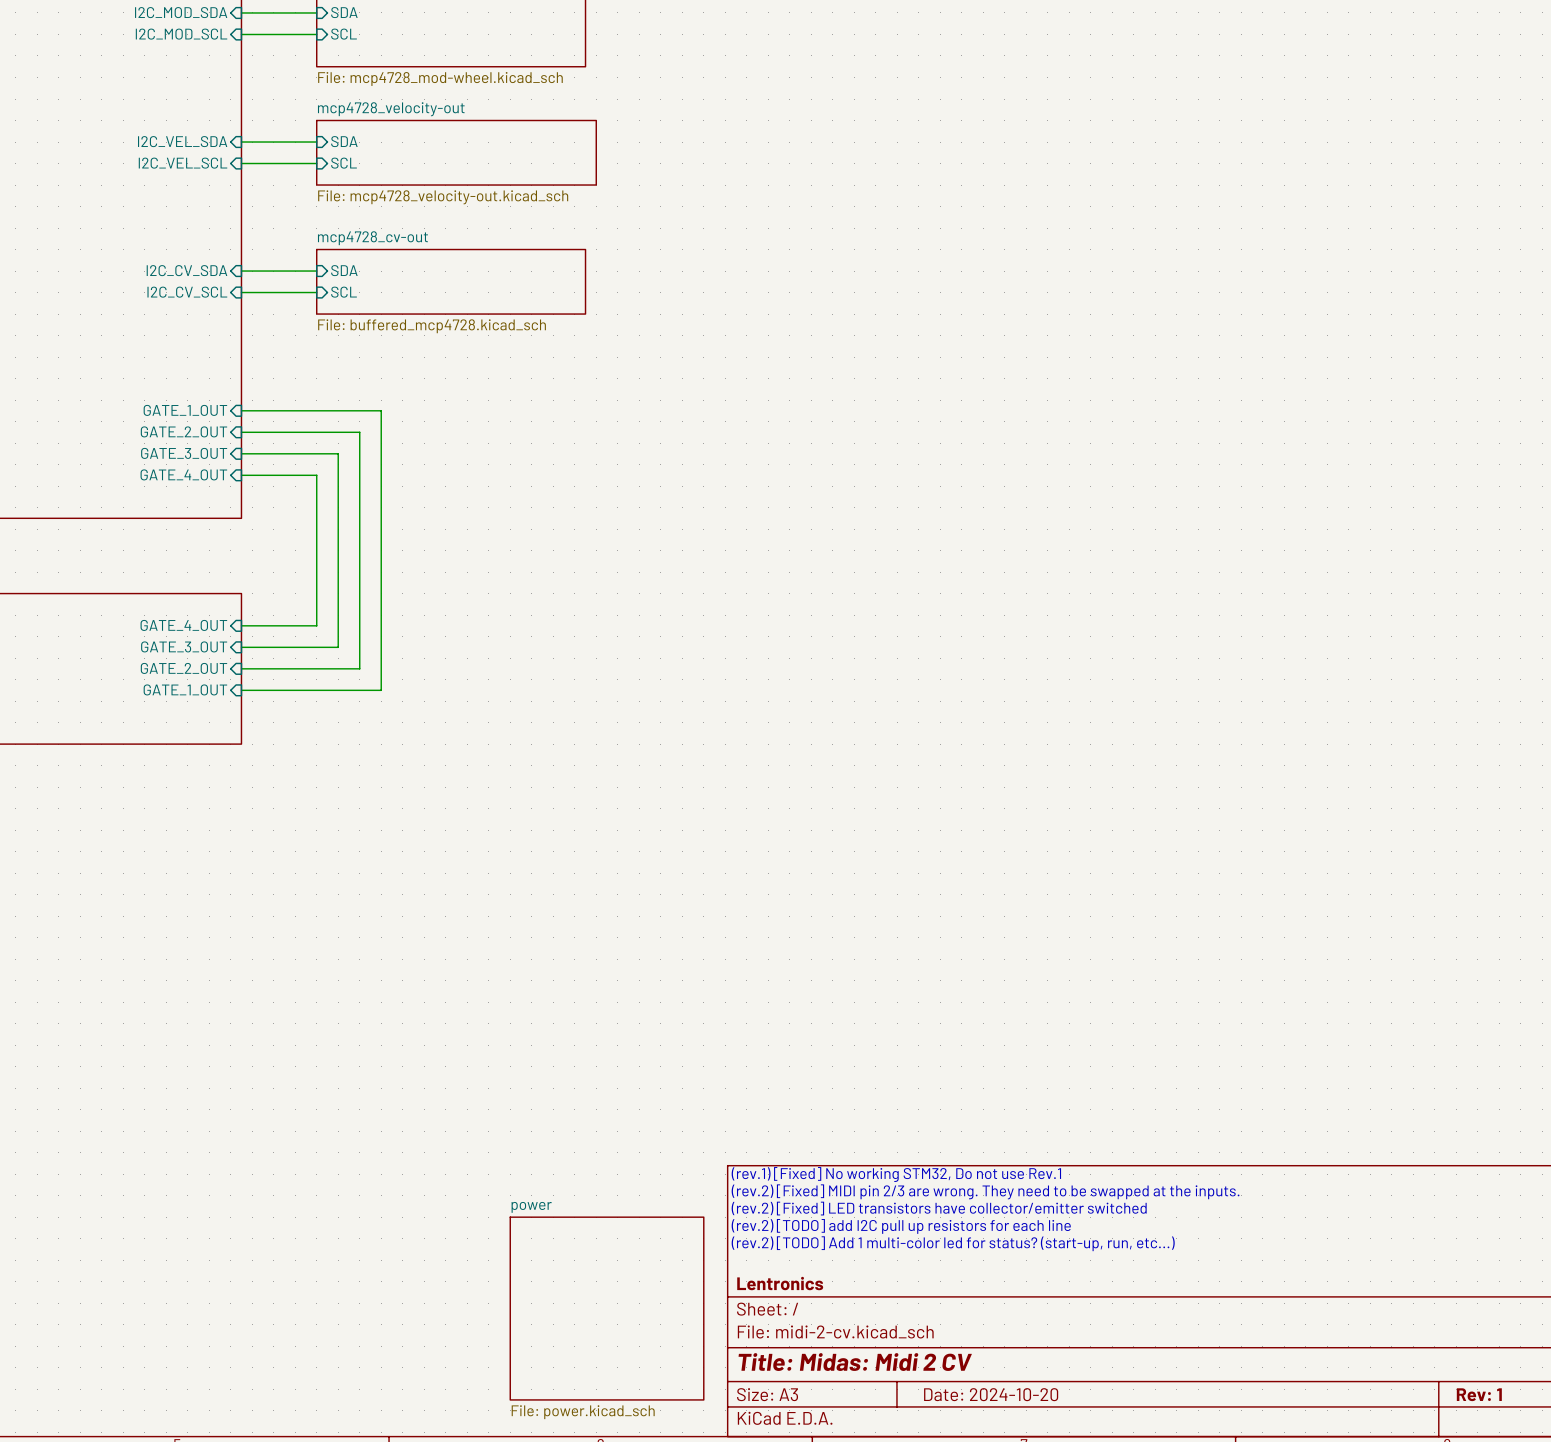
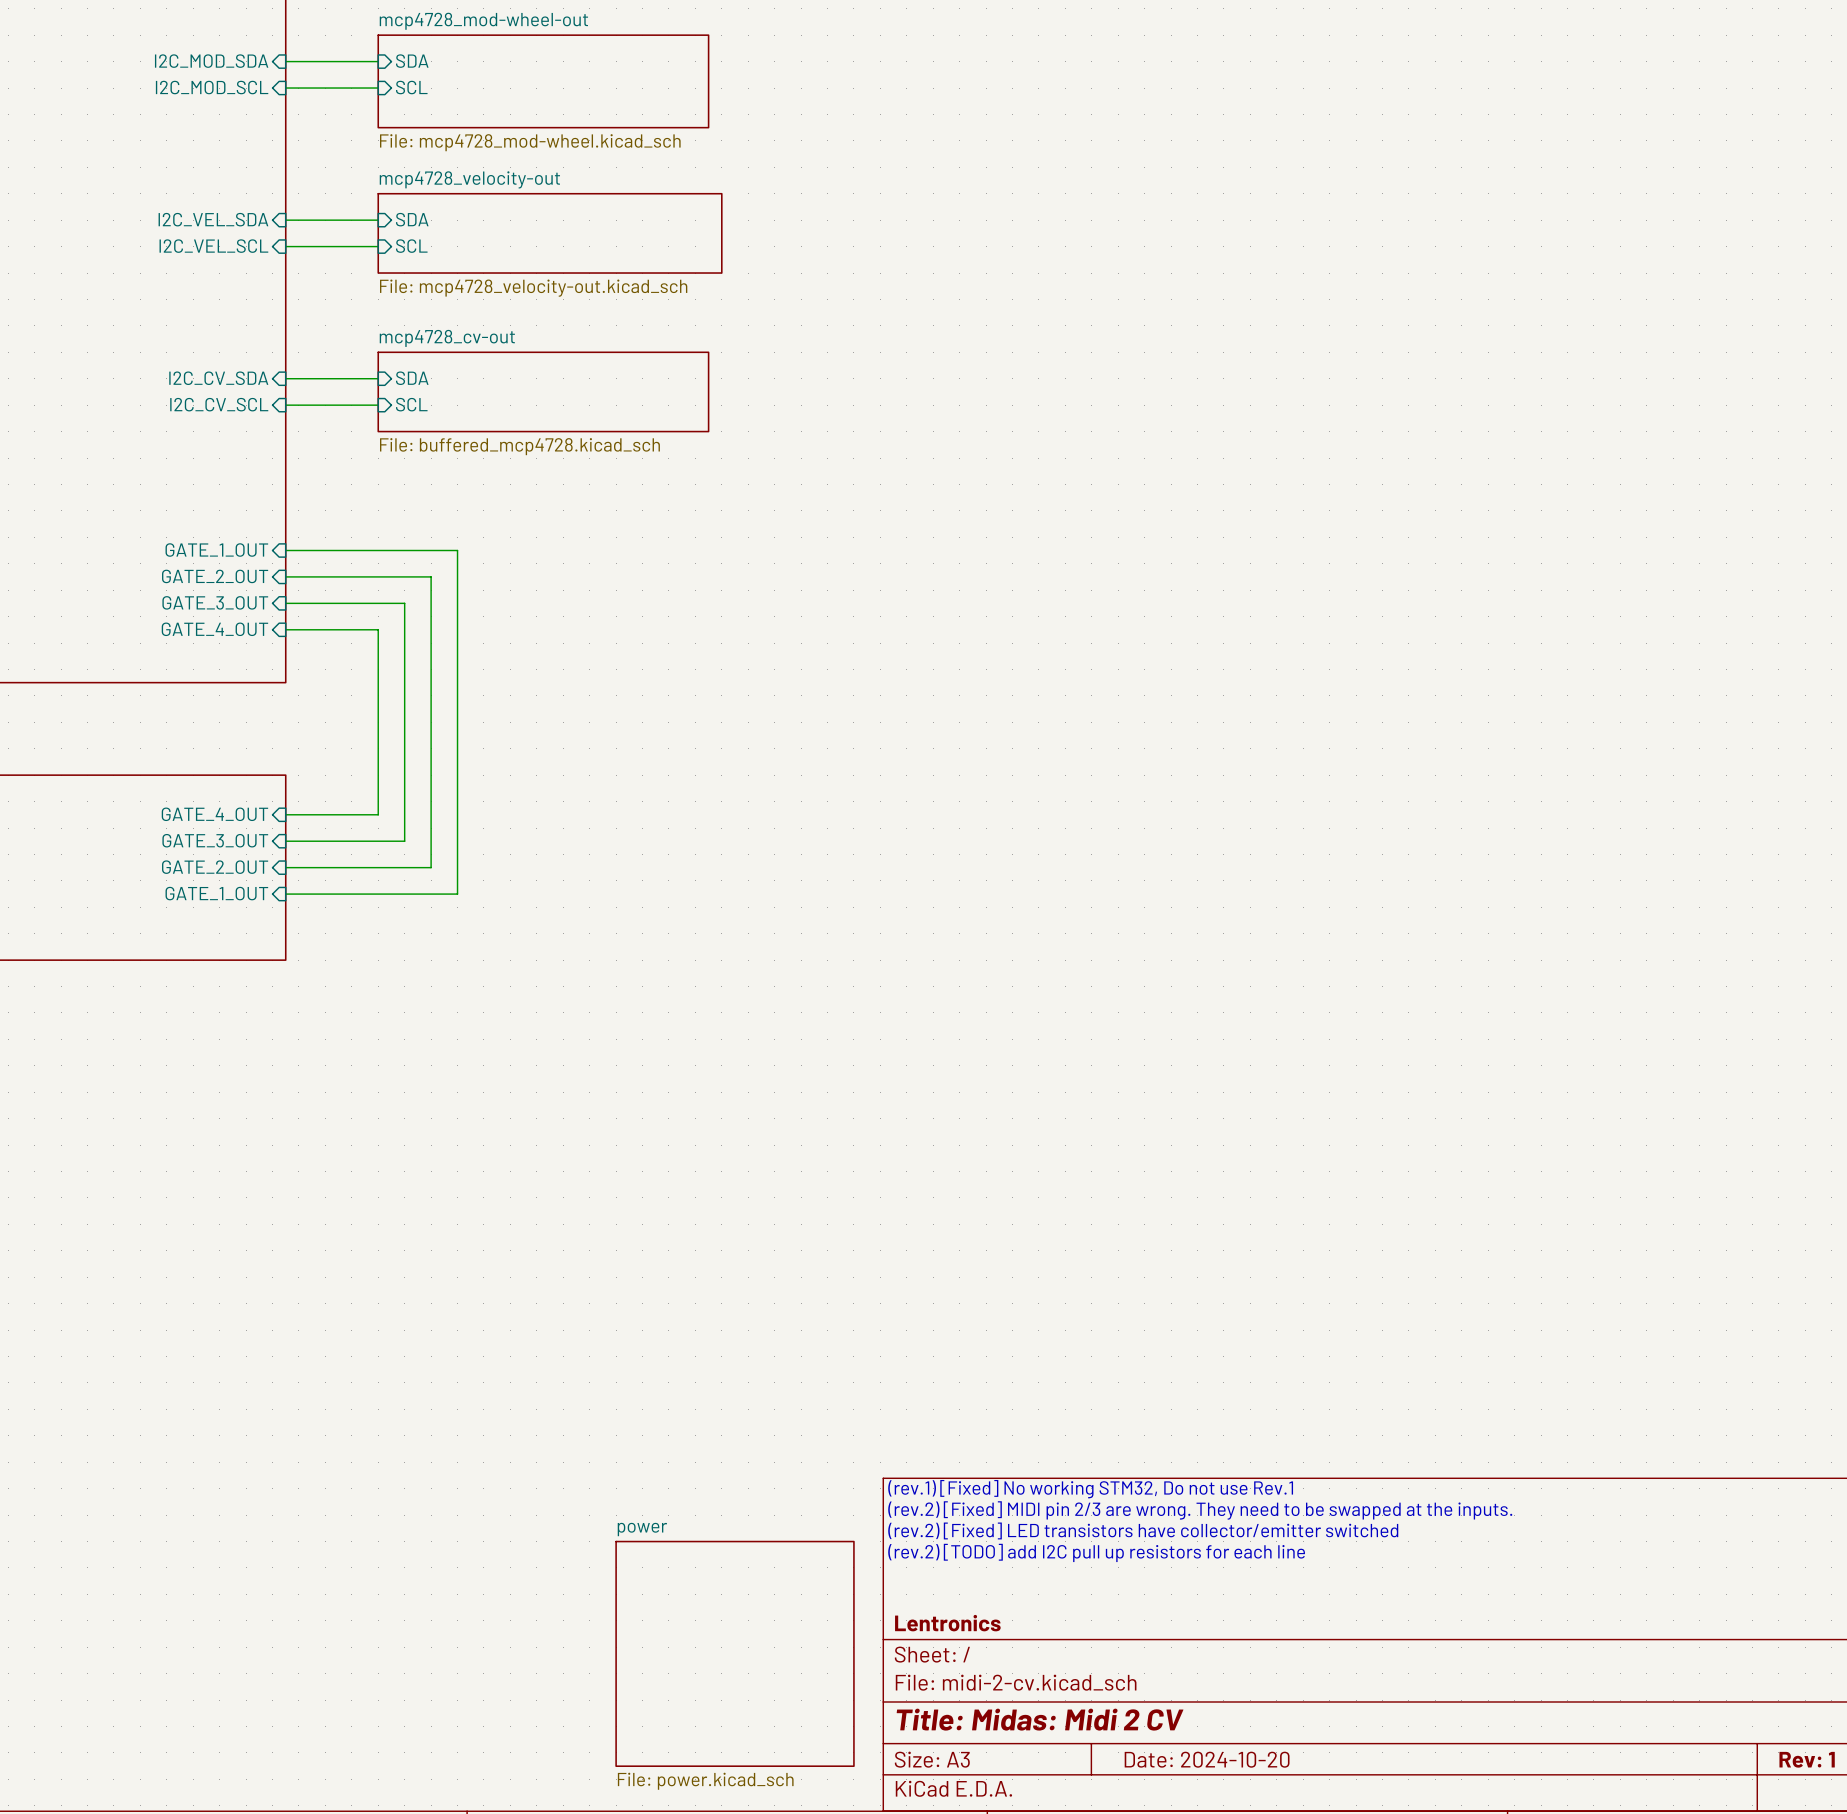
text: (rev.2) [TODO] Add 1 multi-color led for status? (start-up, run, etc...) (953, 1243) -> none

